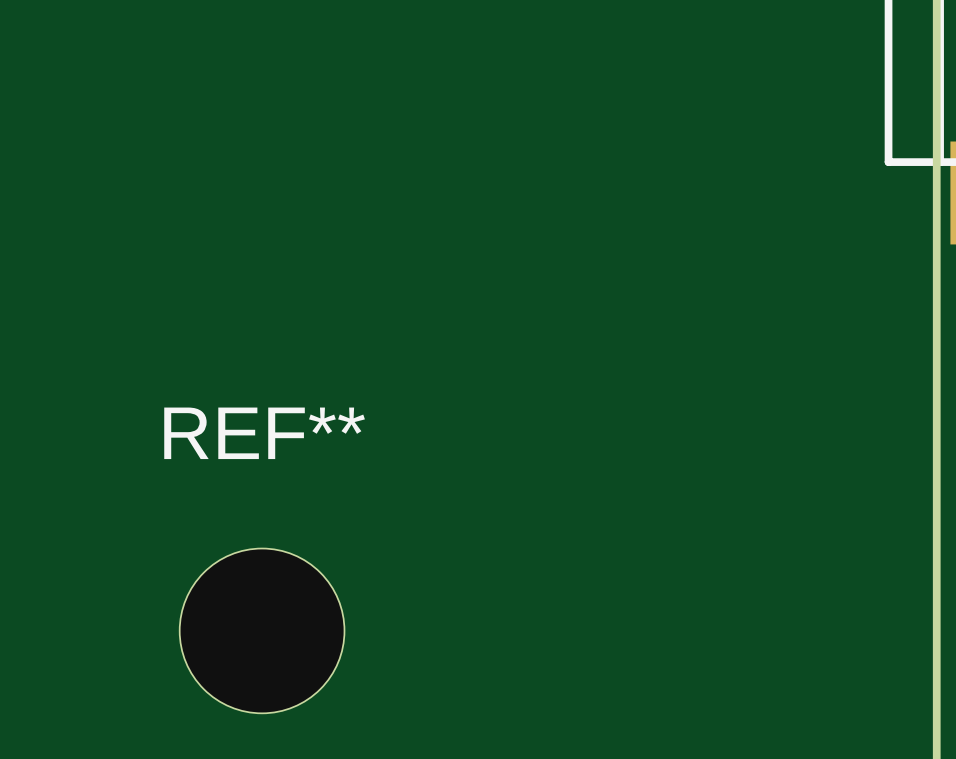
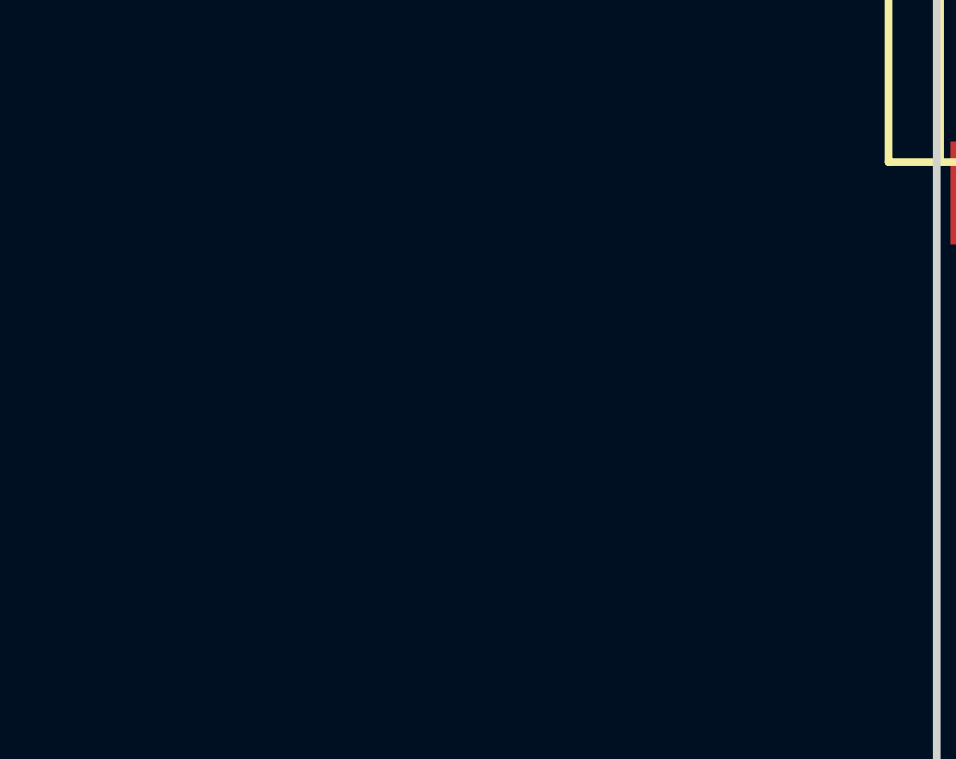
REF**: (262, 630) -> none

